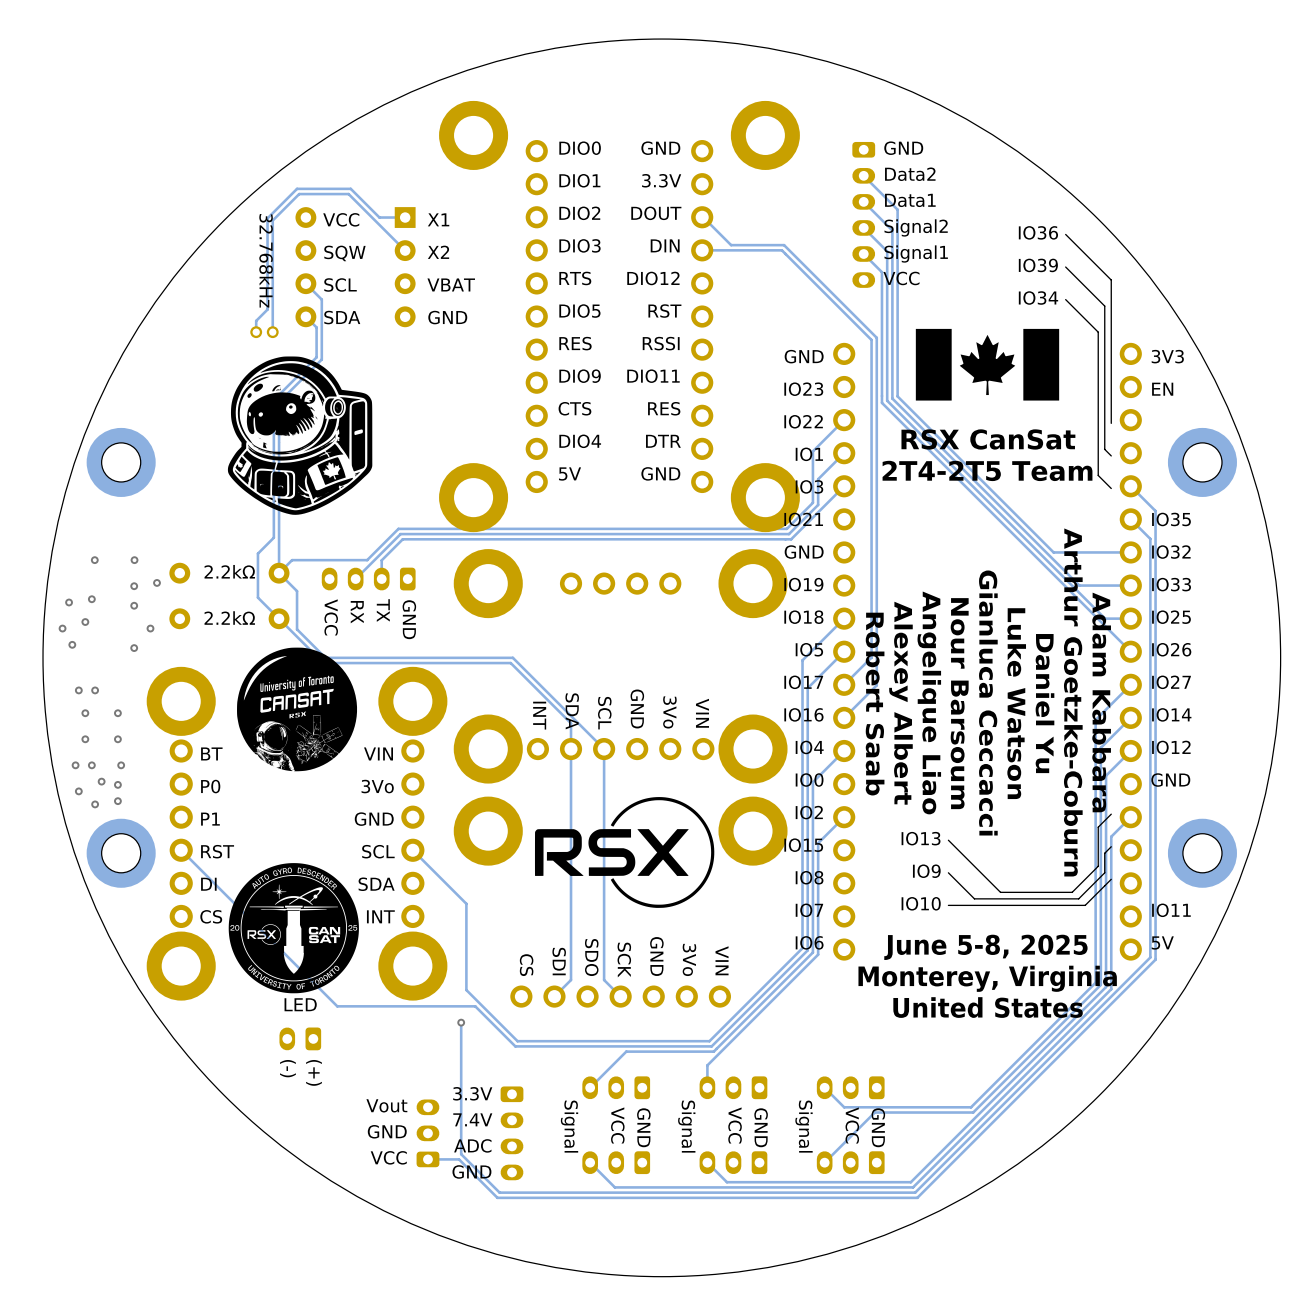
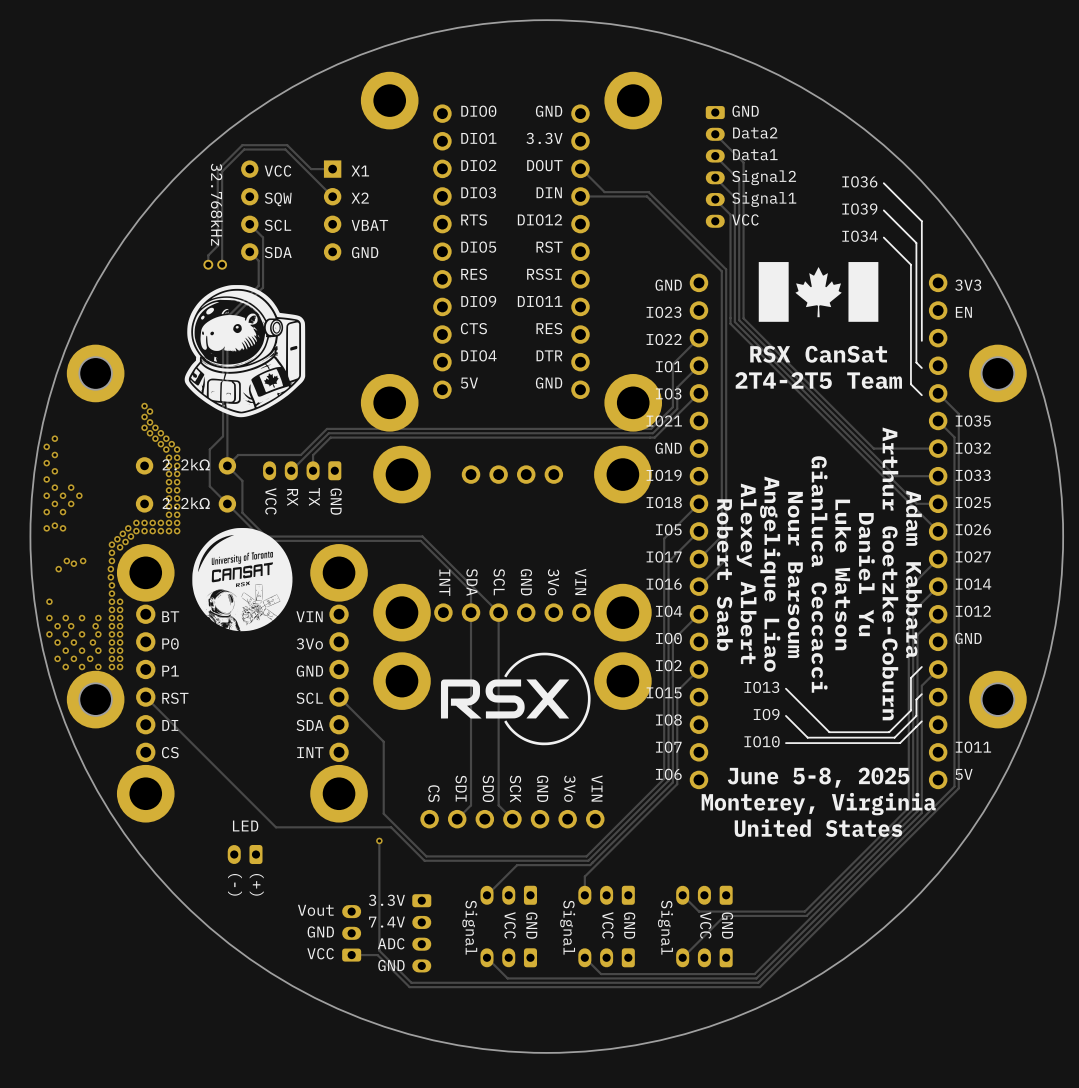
via: none -> (144, 406)
via: none -> (149, 411)
via: none -> (144, 416)
via: none -> (149, 422)
via: none -> (144, 427)
via: none -> (155, 427)
via: none -> (149, 433)
via: none -> (160, 433)
via: none -> (54, 438)
via: none -> (155, 438)
via: none -> (166, 438)
via: none -> (160, 444)
via: none -> (171, 444)
via: none -> (46, 446)
via: none -> (166, 449)
via: none -> (177, 449)
via: none -> (54, 454)
via: (94, 560) -> none
via: (134, 560) -> none
via: none -> (169, 457)
via: none -> (177, 457)
via: none -> (46, 463)
via: none -> (169, 465)
via: none -> (177, 465)
via: none -> (54, 471)
via: (156, 582) -> none
via: none -> (169, 474)
via: none -> (177, 474)
via: (134, 586) -> none
via: none -> (46, 479)
via: none -> (169, 482)
via: none -> (177, 482)
via: none -> (54, 487)
via: (69, 602) -> none
via: none -> (169, 490)
via: none -> (177, 490)
via: (134, 605) -> none
via: none -> (46, 495)
via: none -> (63, 495)
via: none -> (79, 495)
via: none -> (169, 498)
via: none -> (177, 498)
via: none -> (54, 503)
via: none -> (71, 503)
via: (85, 622) -> none
via: none -> (169, 506)
via: none -> (177, 506)
via: none -> (63, 512)
via: (150, 628) -> none
via: none -> (169, 514)
via: none -> (177, 514)
via: none -> (136, 522)
via: none -> (144, 522)
via: none -> (152, 522)
via: none -> (160, 522)
via: none -> (169, 522)
via: none -> (177, 522)
via: none -> (46, 528)
via: none -> (63, 528)
via: (134, 648) -> none
via: none -> (128, 528)
via: none -> (136, 531)
via: none -> (144, 531)
via: none -> (152, 531)
via: none -> (160, 531)
via: none -> (169, 531)
via: none -> (177, 531)
via: none -> (122, 533)
via: none -> (130, 536)
via: none -> (117, 539)
via: none -> (125, 541)
via: none -> (111, 544)
via: none -> (120, 547)
via: none -> (111, 552)
via: none -> (66, 560)
via: none -> (83, 560)
via: none -> (111, 560)
via: (78, 690) -> none
via: none -> (58, 569)
via: none -> (110, 569)
via: none -> (110, 577)
via: (85, 713) -> none
via: (117, 713) -> none
via: none -> (111, 585)
via: none -> (111, 593)
via: none -> (49, 601)
via: none -> (111, 601)
via: none -> (120, 601)
via: (85, 739) -> none
via: (117, 739) -> none
via: none -> (111, 609)
via: none -> (120, 609)
via: none -> (49, 618)
via: none -> (65, 618)
via: none -> (82, 618)
via: none -> (98, 618)
via: none -> (111, 618)
via: none -> (120, 618)
via: none -> (111, 626)
via: none -> (120, 626)
via: none -> (49, 634)
via: none -> (65, 634)
via: none -> (82, 634)
via: none -> (98, 634)
via: none -> (111, 634)
via: none -> (120, 634)
via: (101, 781) -> none
via: none -> (57, 642)
via: none -> (73, 642)
via: none -> (111, 642)
via: none -> (120, 642)
via: (78, 791) -> none
via: none -> (65, 650)
via: none -> (82, 650)
via: none -> (98, 650)
via: none -> (111, 650)
via: none -> (120, 650)
via: (117, 801) -> none
via: none -> (57, 658)
via: none -> (90, 658)
via: none -> (111, 658)
via: none -> (120, 658)
via: none -> (65, 666)
via: none -> (82, 666)
via: none -> (98, 666)
via: none -> (111, 666)
via: none -> (120, 666)
drawing: [228, 863, 359, 994] -> none

